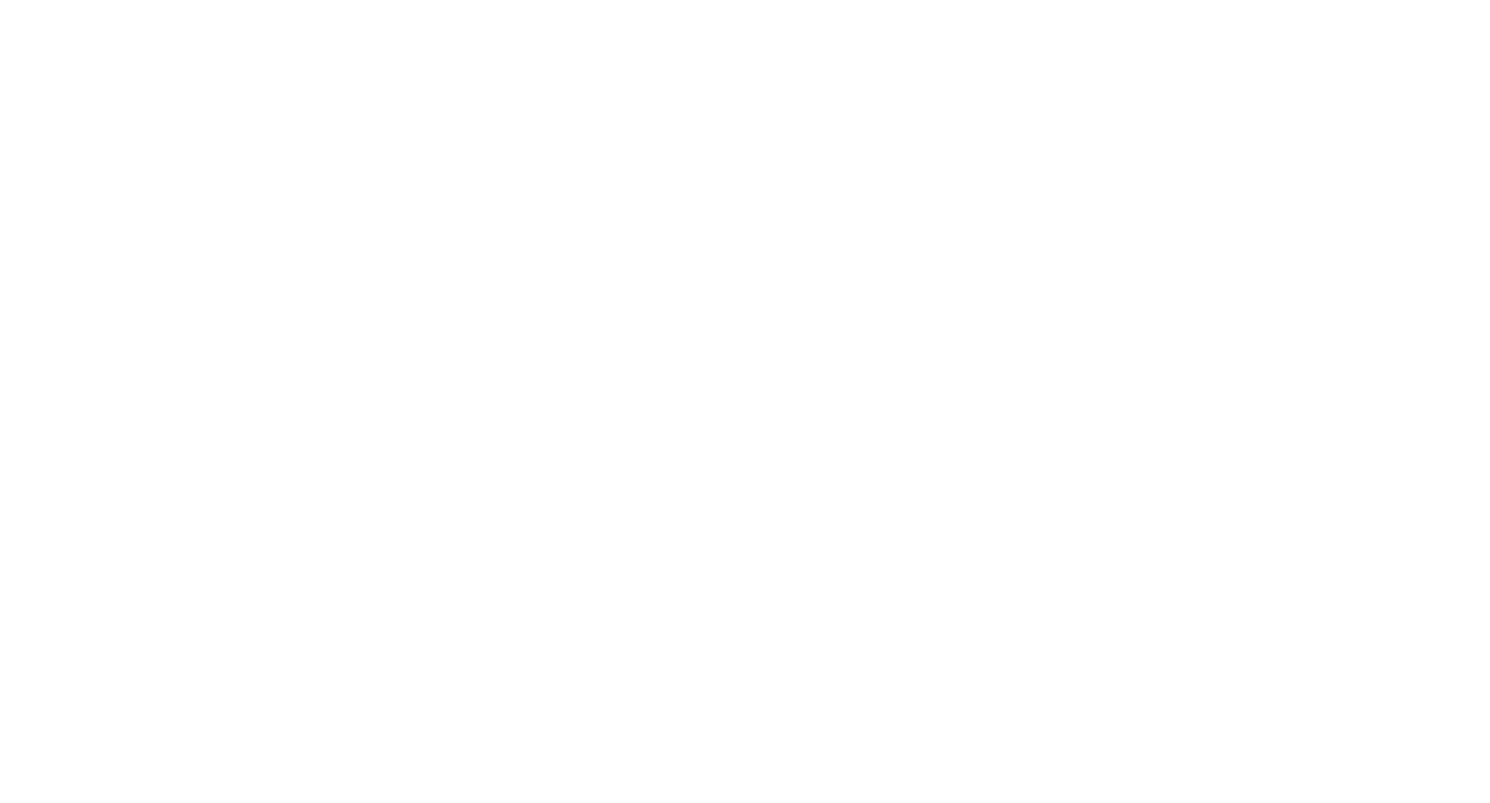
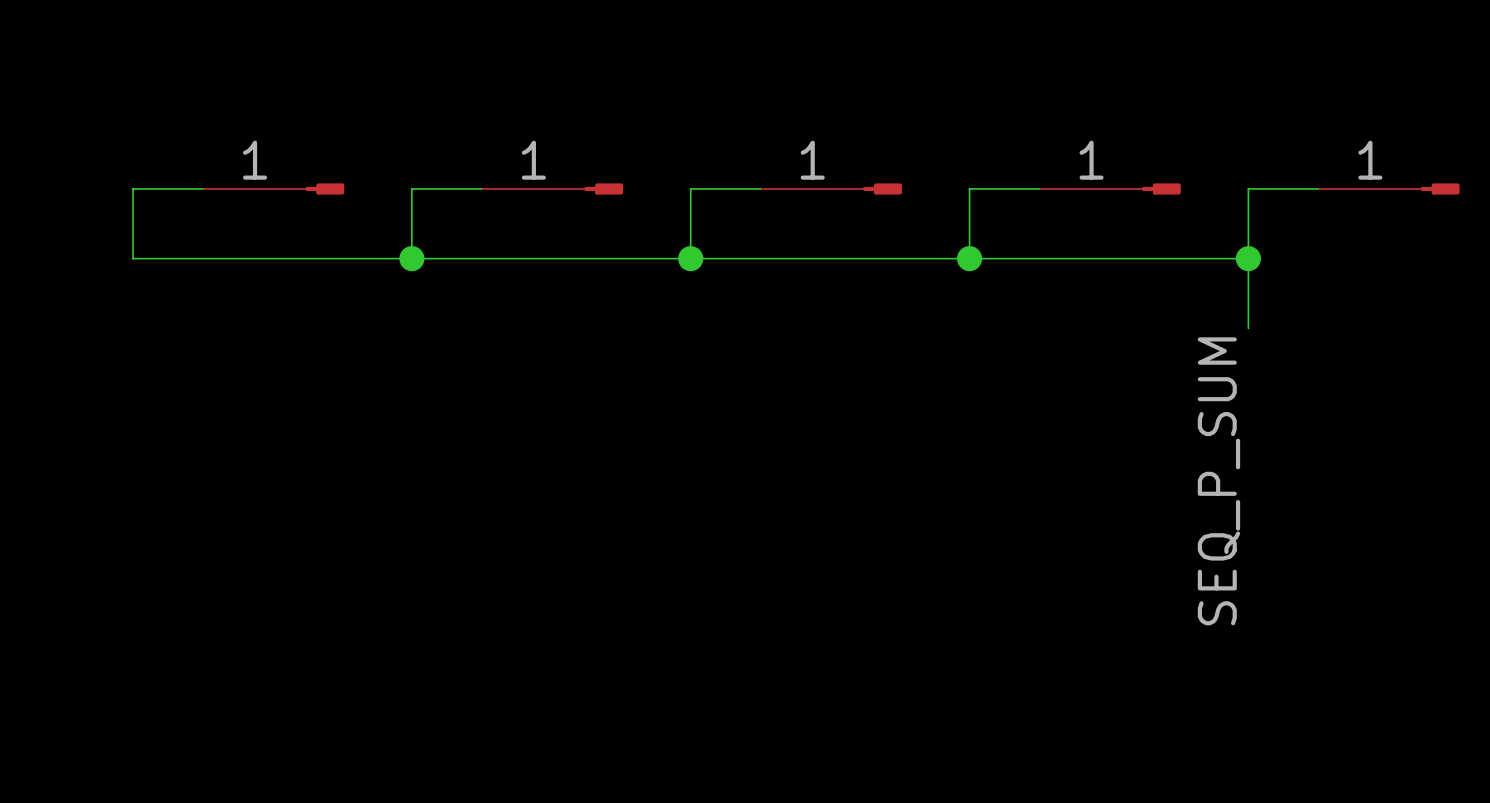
wire: none -> (202, 188) (133, 188) (133, 258) (1248, 258)
part: none -> (273, 188)
wire: none -> (481, 188) (411, 188) (411, 258)
part: none -> (552, 188)
wire: none -> (760, 188) (690, 188) (690, 258)
part: none -> (831, 188)
wire: none -> (1039, 188) (969, 188) (969, 258)
part: none -> (1110, 188)
wire: none -> (1318, 188) (1248, 188) (1248, 328)
part: none -> (1388, 188)
junction: none -> (411, 258)
junction: none -> (690, 258)
junction: none -> (969, 258)
junction: none -> (1248, 258)
label: none -> SEQ_P_SUM (1218, 481)

